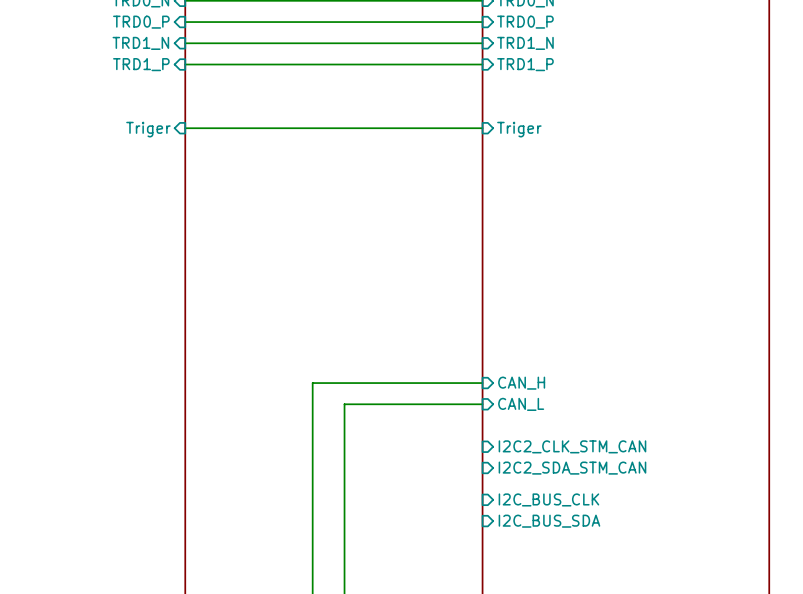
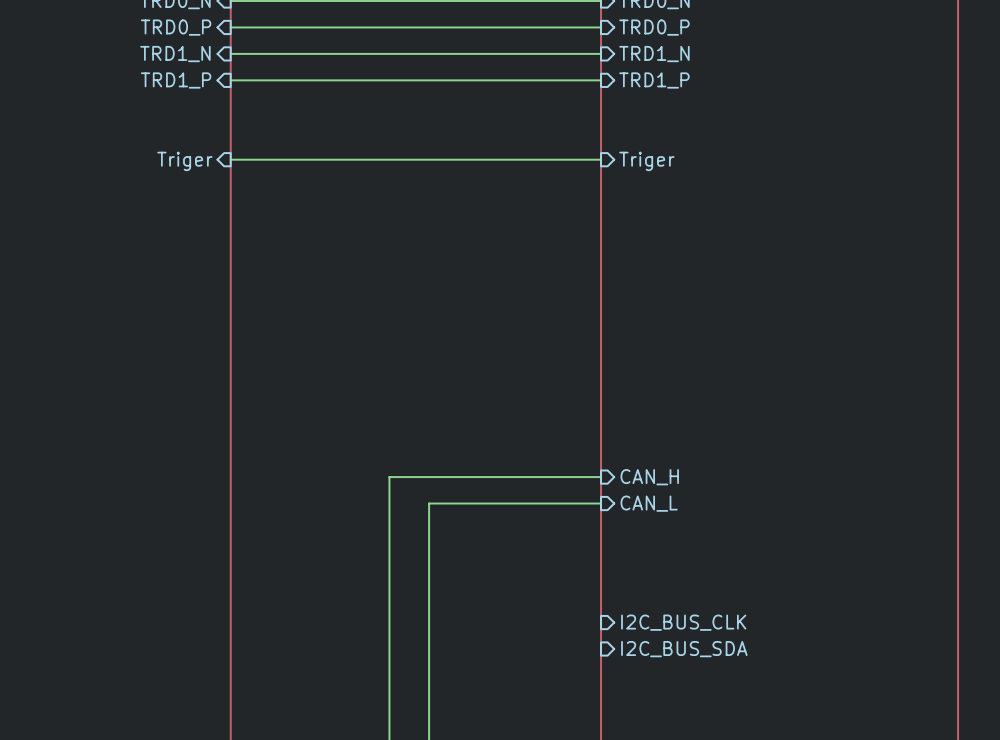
sheet pin: I2C2_CLK_STM_CAN (572, 446) -> none
sheet pin: I2C2_SDA_STM_CAN (572, 468) -> none

